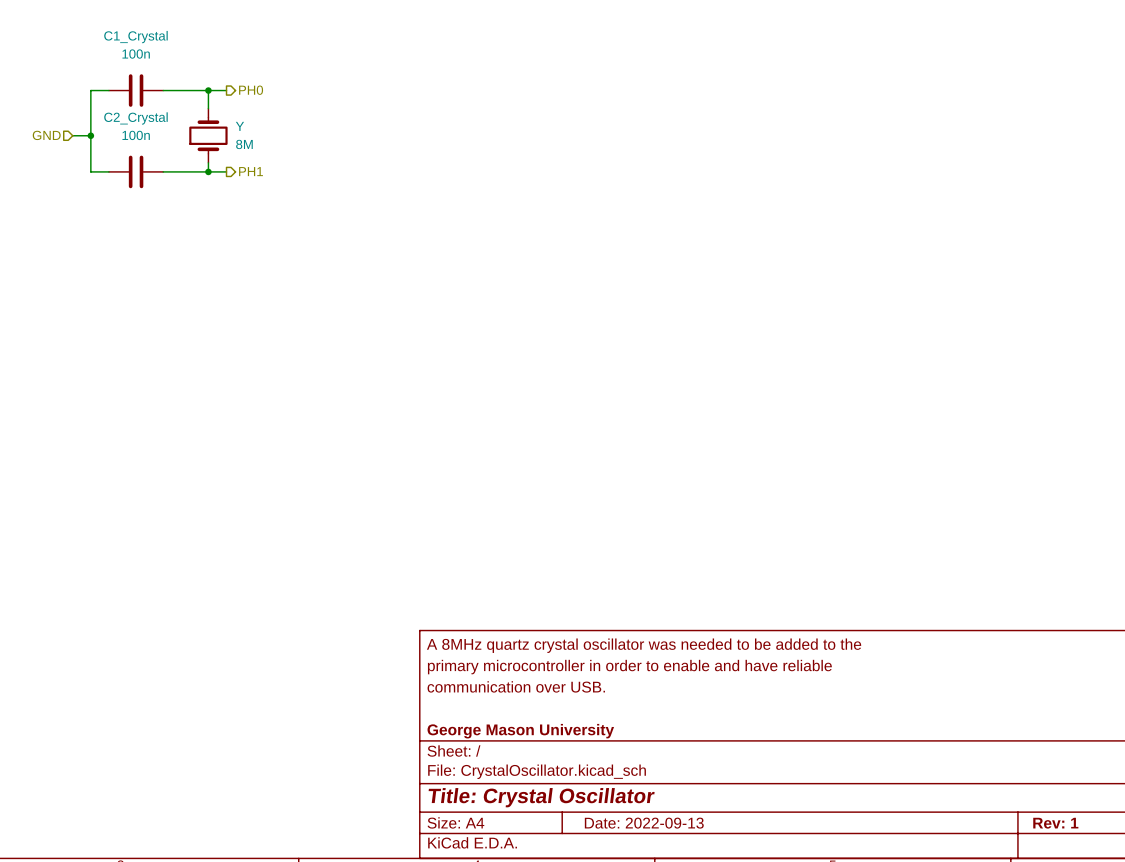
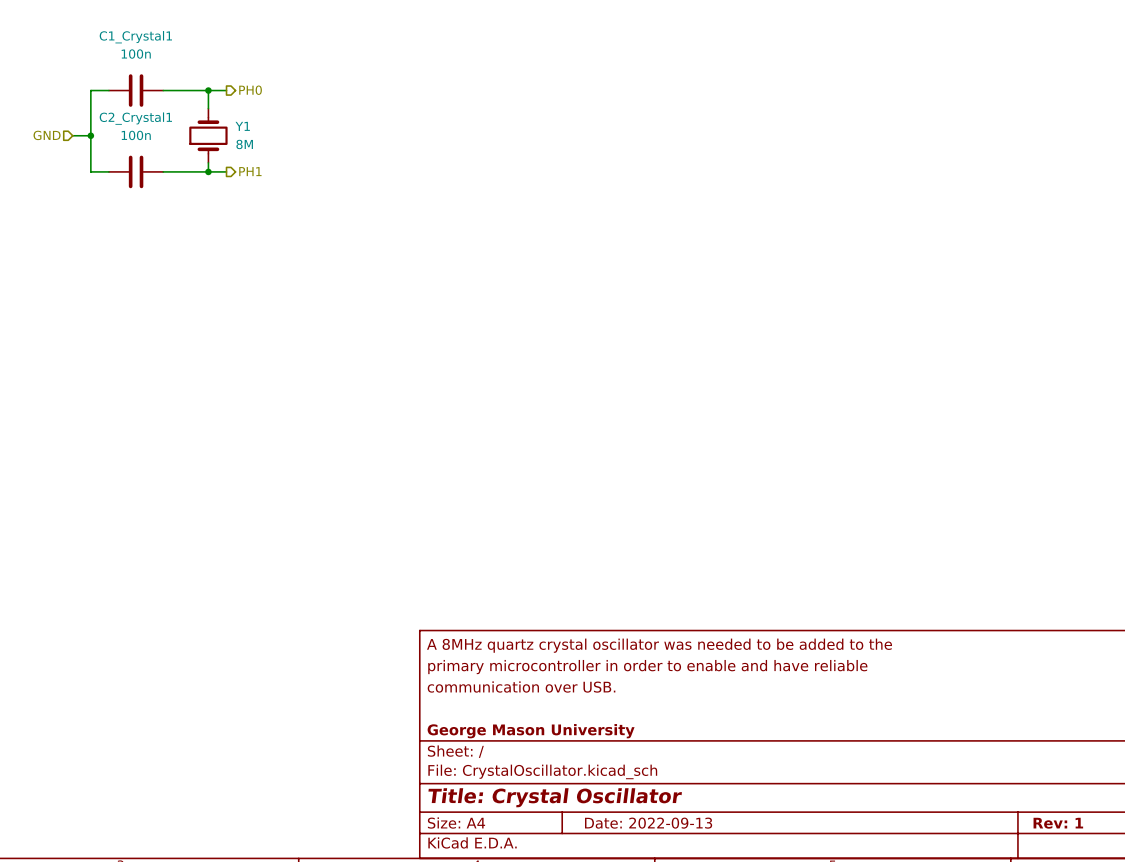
C1_Crystal name: C1_Crystal (135, 37) -> C1_Crystal1 (135, 37)
C2_Crystal name: C2_Crystal (135, 118) -> C2_Crystal1 (135, 118)
Y name: Y (239, 126) -> Y1 (242, 126)

